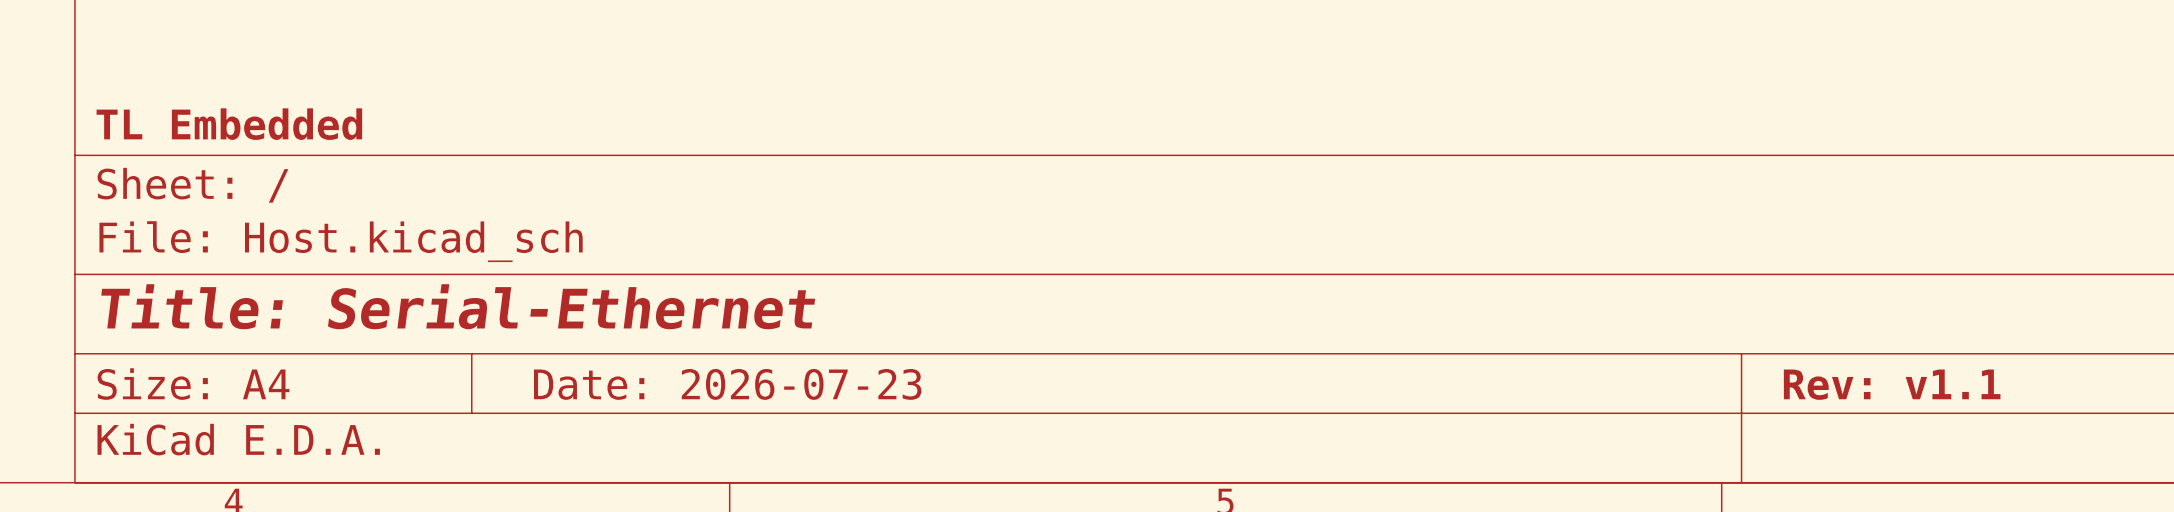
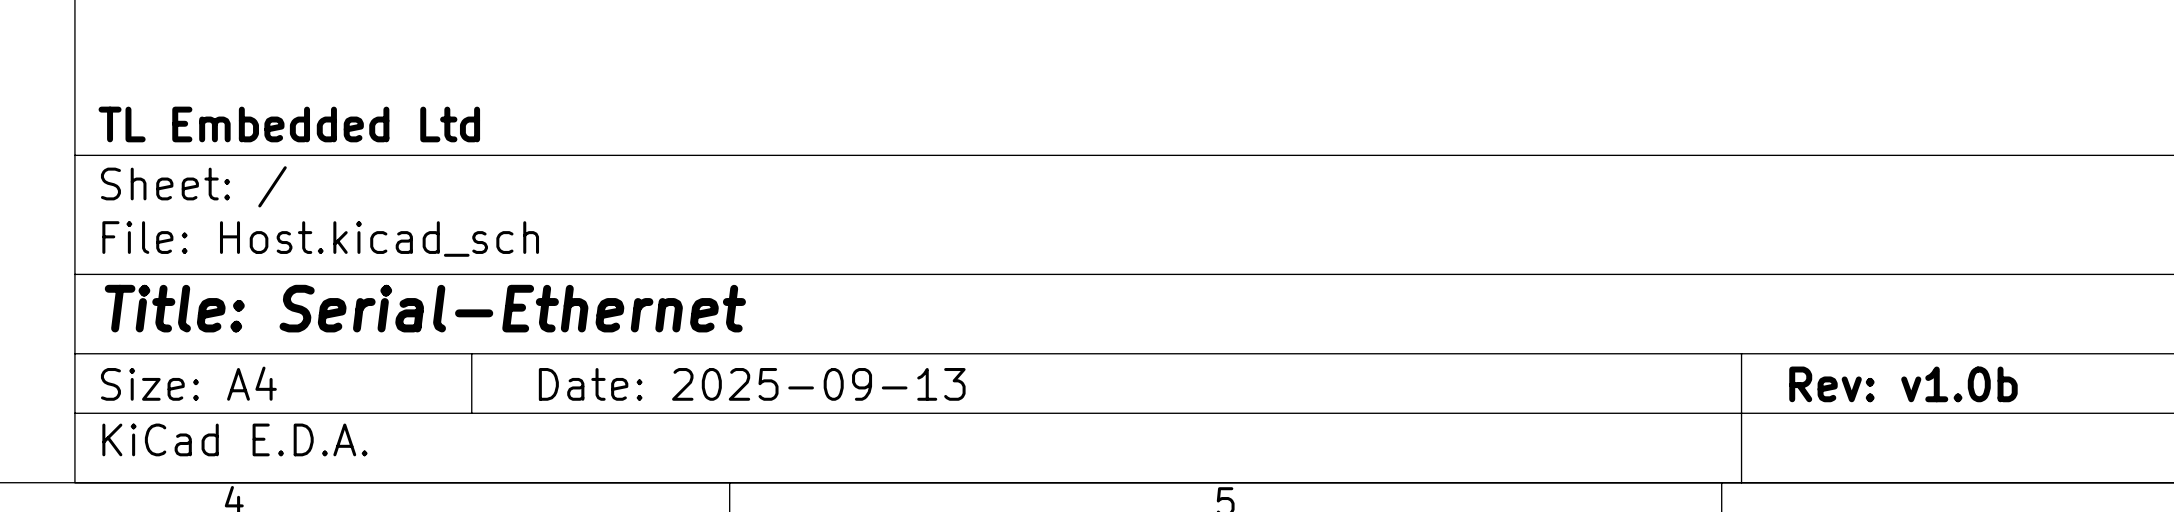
title block: TL Embedded (229, 124) -> TL Embedded Ltd (289, 124)
title block: Date: 2026-07-23 (727, 384) -> Date: 2025-09-13 (752, 384)
title block: Rev: v1.1 (1892, 384) -> Rev: v1.0b (1903, 384)

